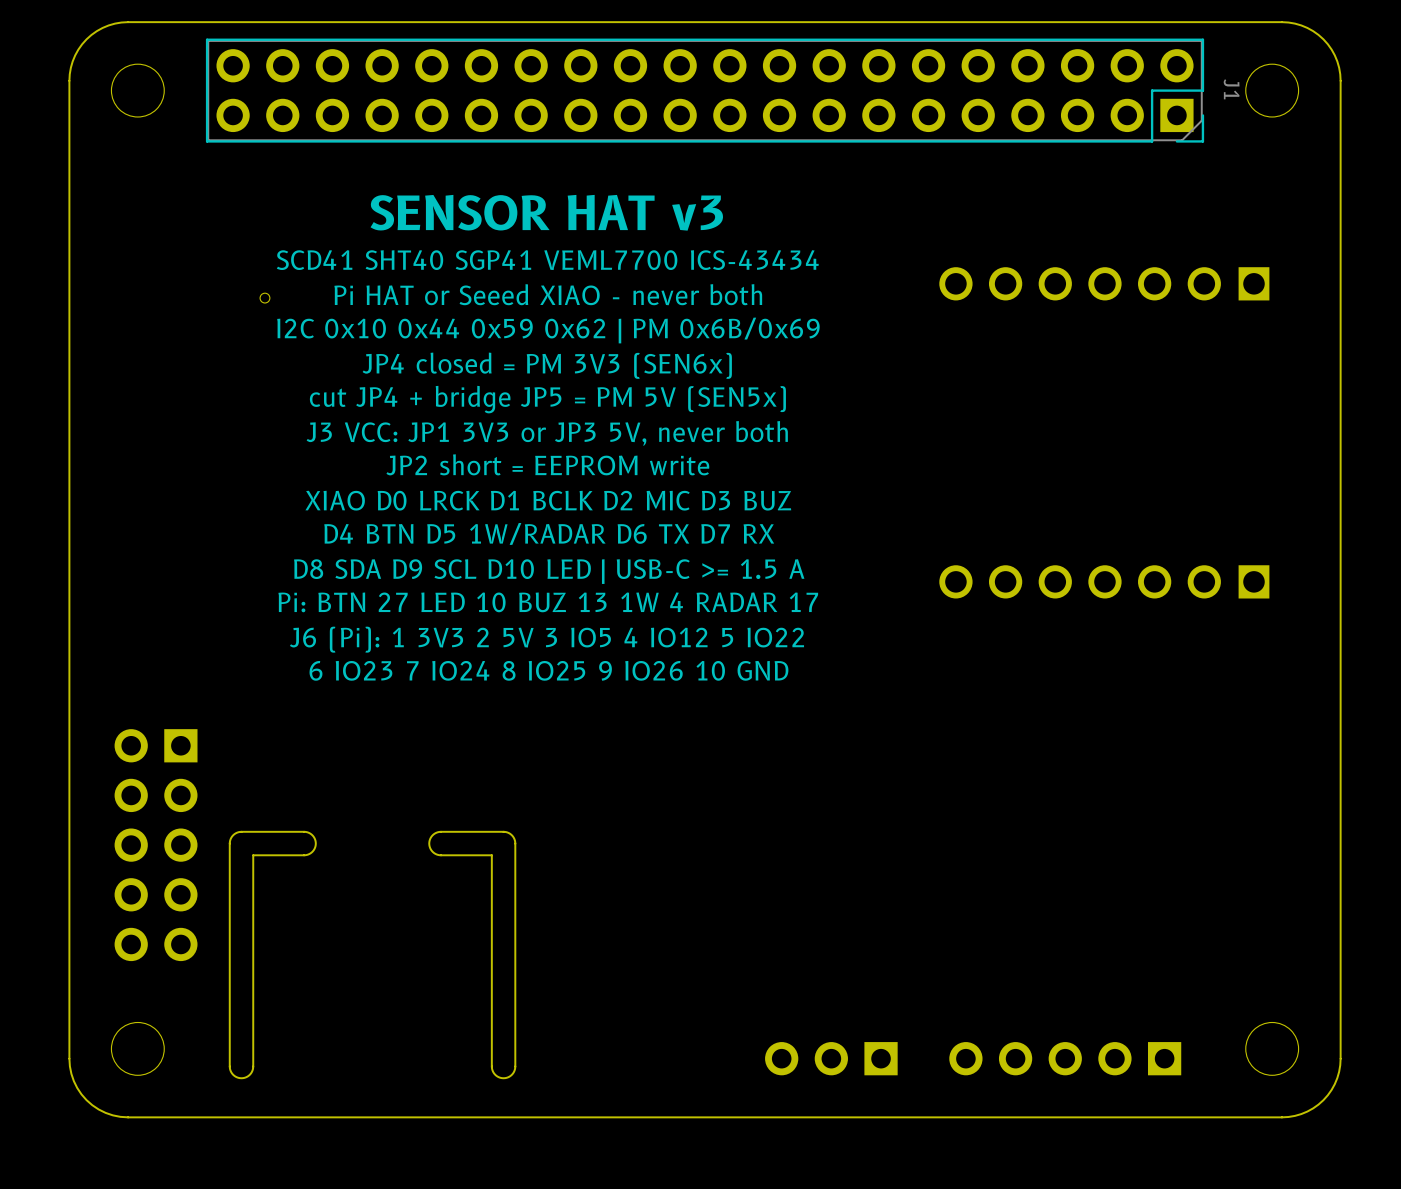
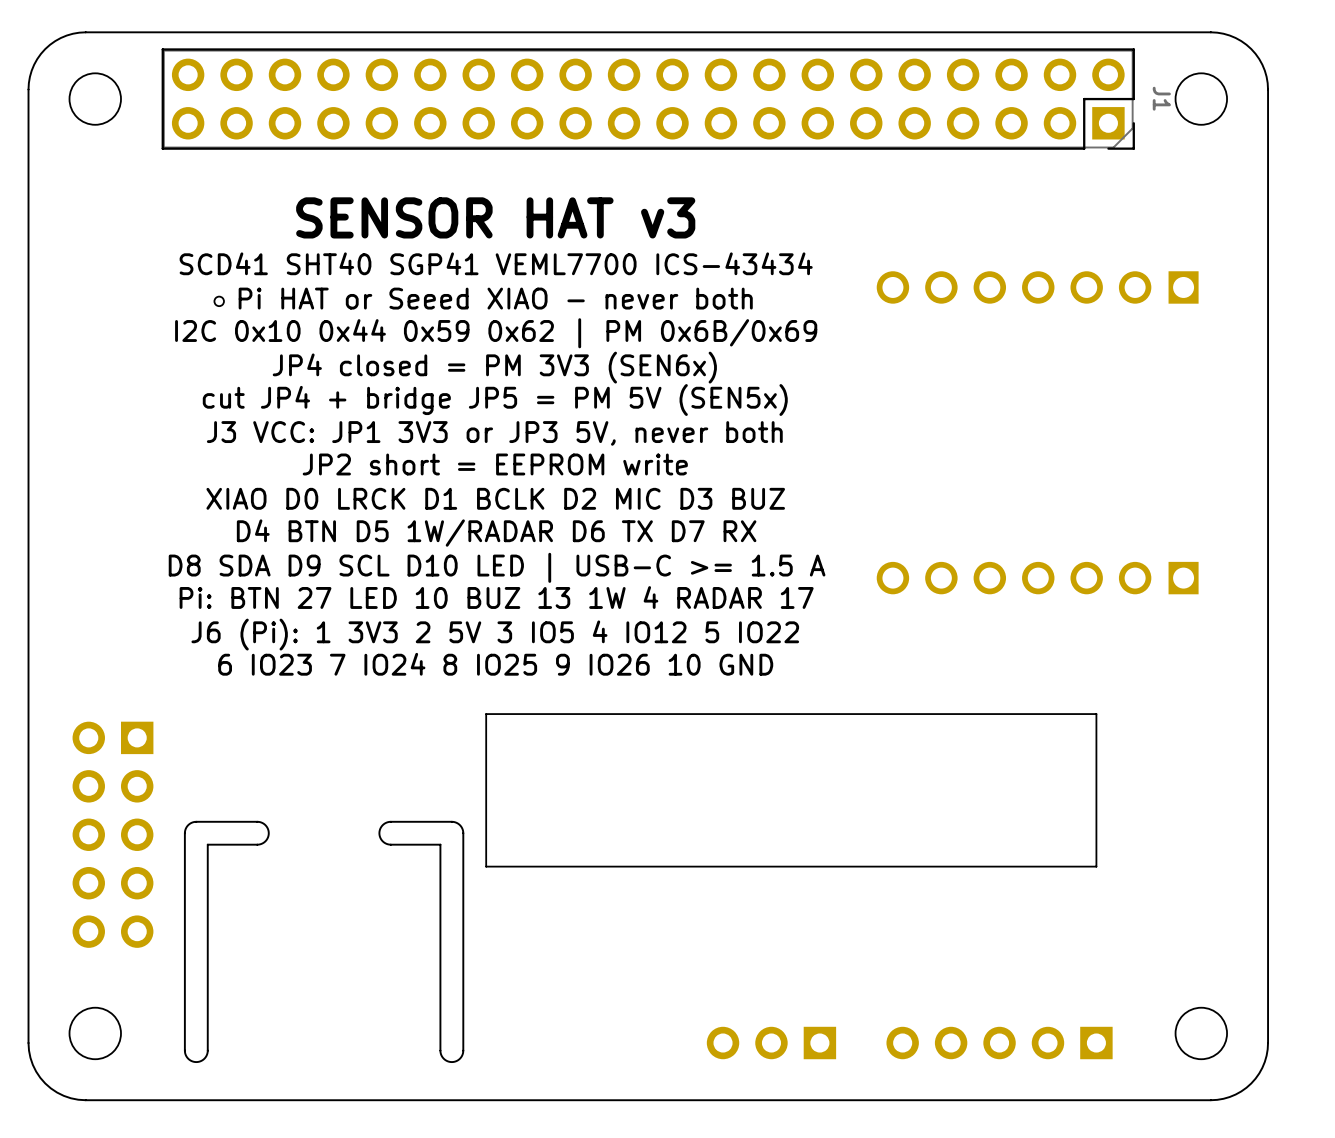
line: none -> (1096, 714) (486, 714) (486, 866) (1096, 866) (1096, 714)

